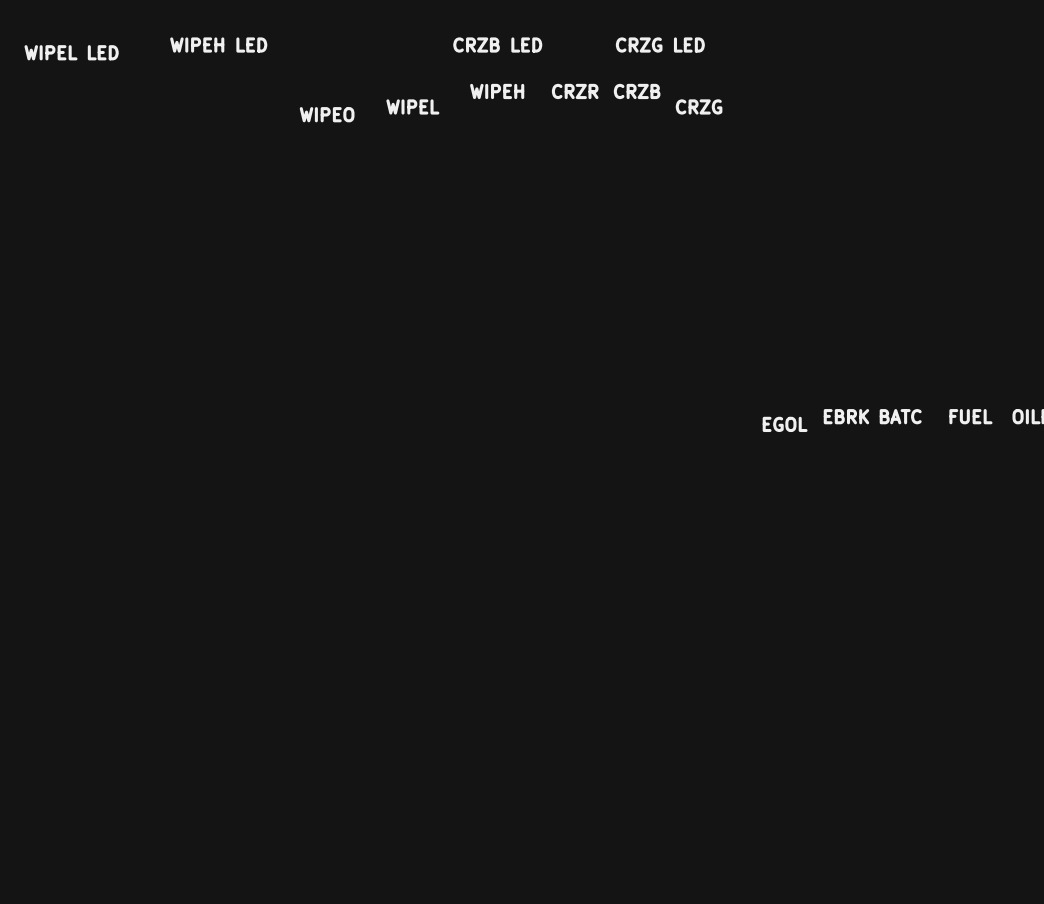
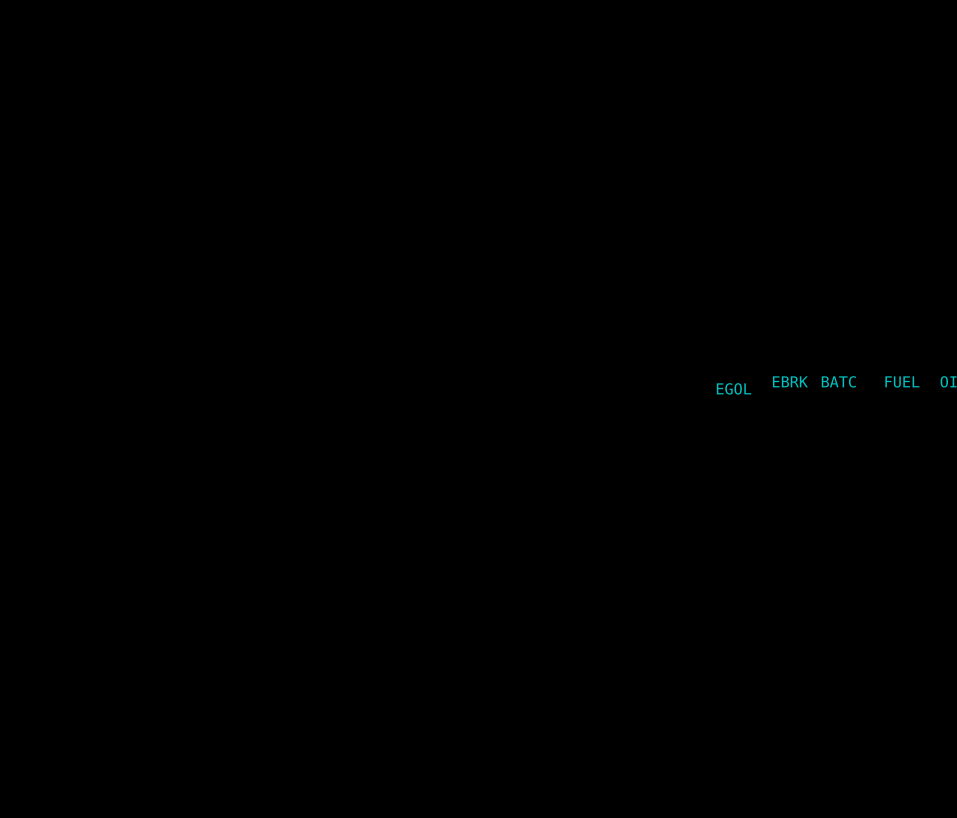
text: WIPEH LED (218, 45) -> none
text: CRZB LED (497, 45) -> none
text: CRZG LED (660, 45) -> none
text: WIPEL LED (71, 52) -> none
text: WIPEH (497, 91) -> none
text: CRZR (575, 91) -> none
text: CRZB (637, 91) -> none
text: WIPEL (412, 106) -> none
text: CRZG (699, 106) -> none
text: WIPEO (327, 114) -> none

